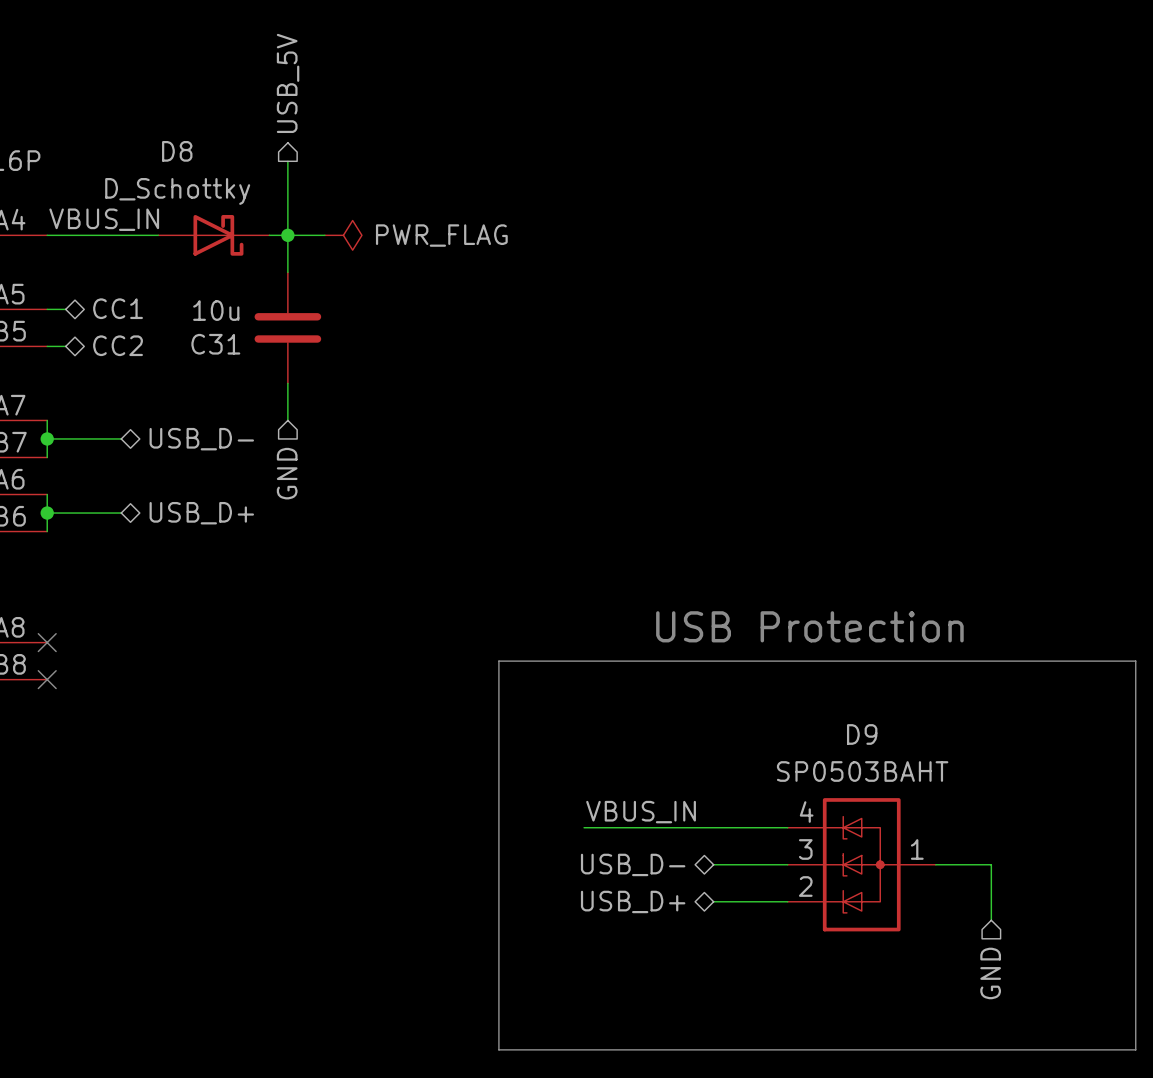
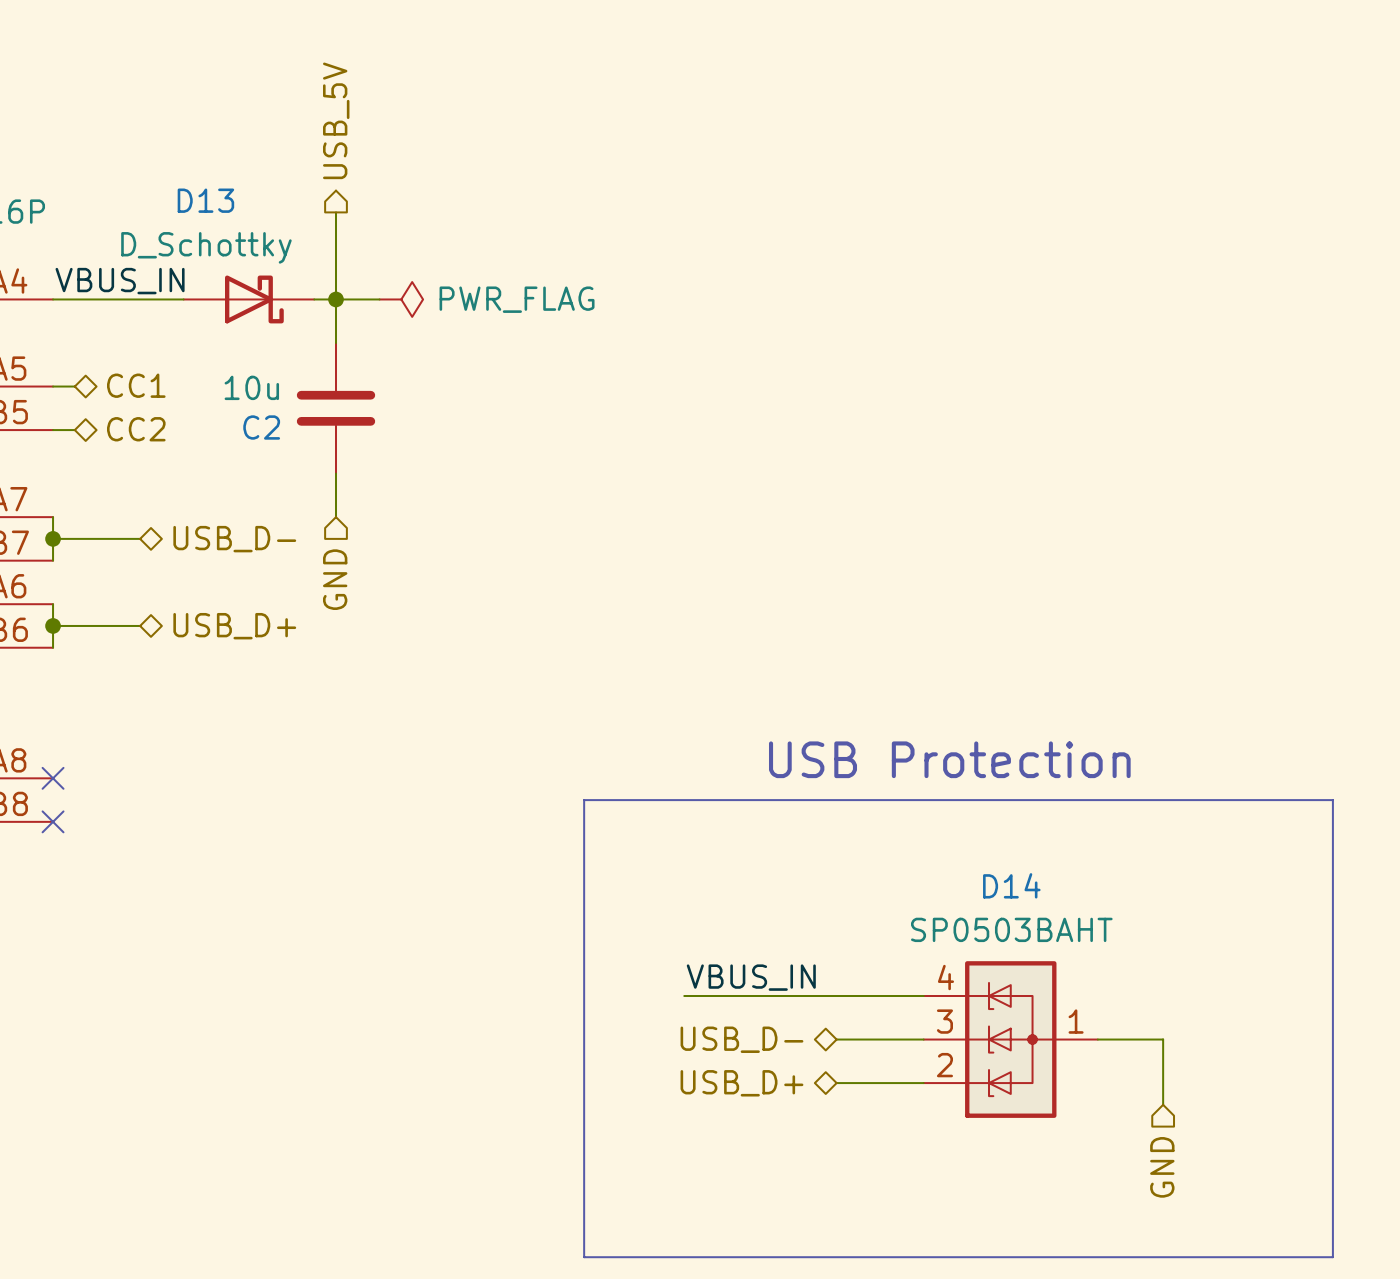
D8 name: D8 (177, 151) -> D13 (205, 200)
C31 name: C31 (215, 344) -> C2 (261, 427)
D9 name: D9 (862, 734) -> D14 (1011, 885)

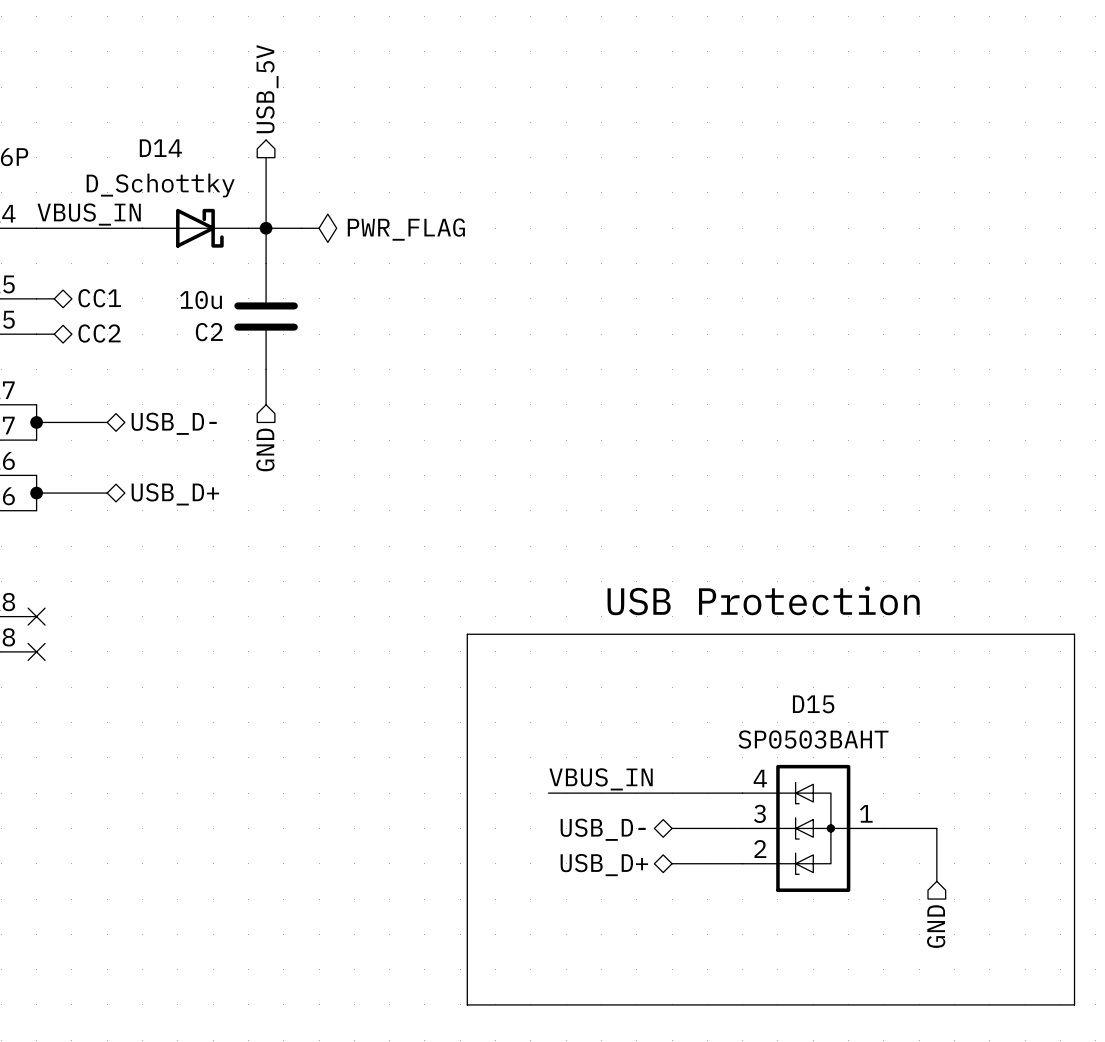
D13 name: D13 (205, 200) -> D14 (160, 148)
D14 name: D14 (1011, 885) -> D15 (813, 704)

